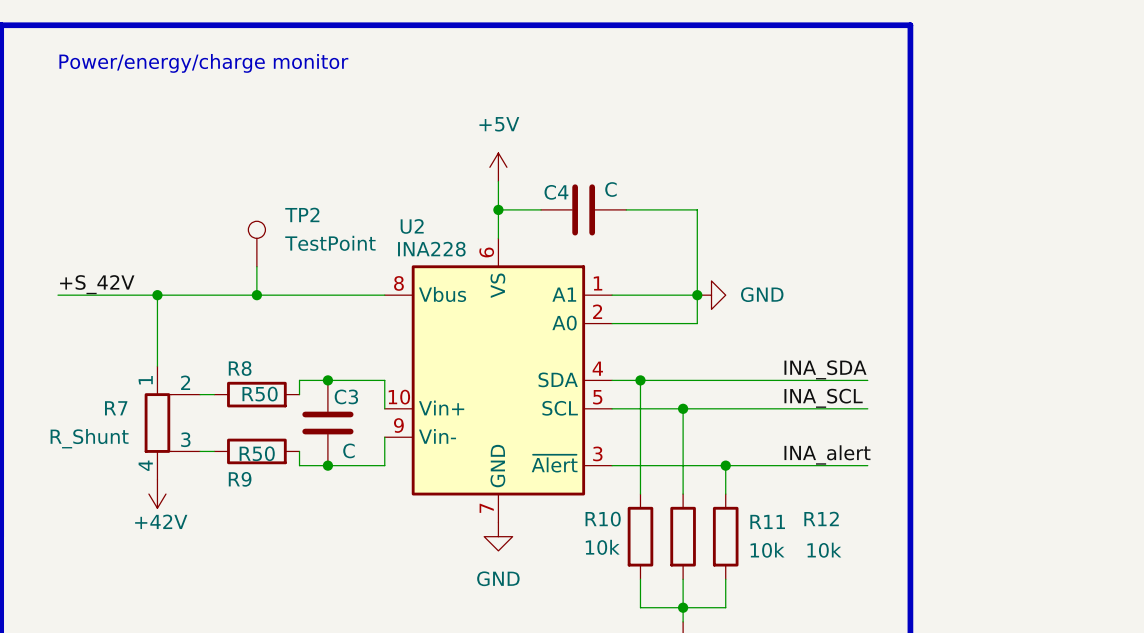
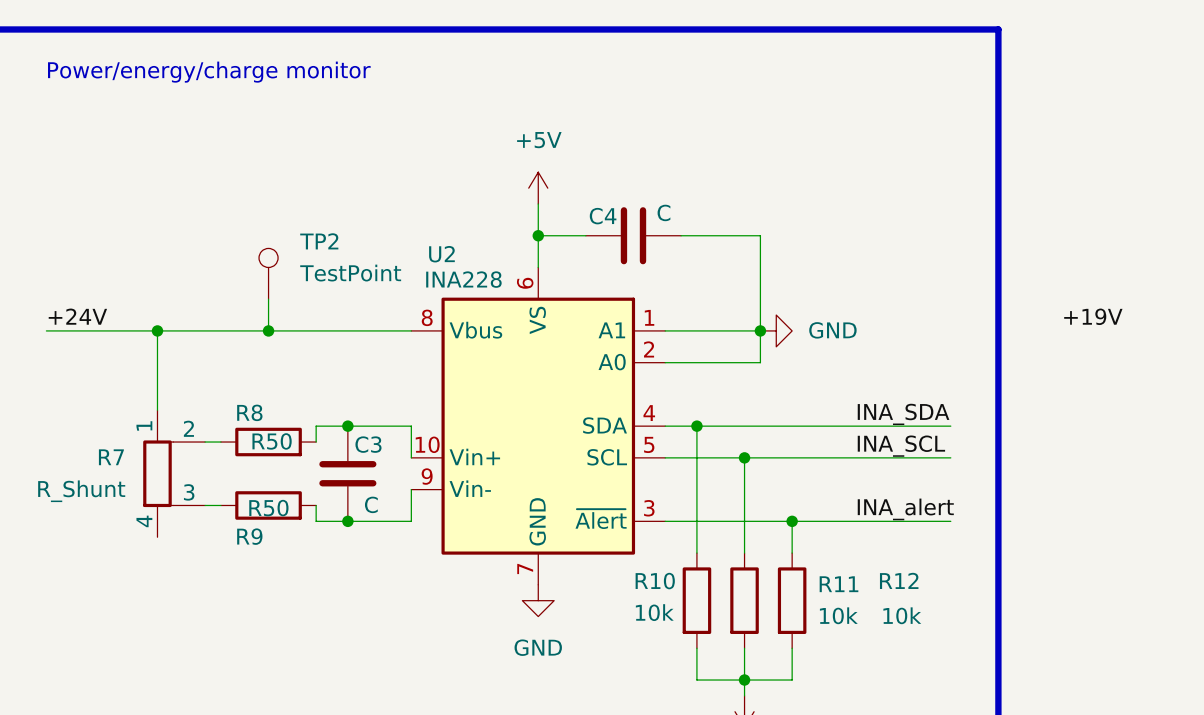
label: none -> +19V (1093, 316)
label: +S_42V (97, 284) -> +24V (77, 316)
power symbol: +42V (157, 494) -> none

